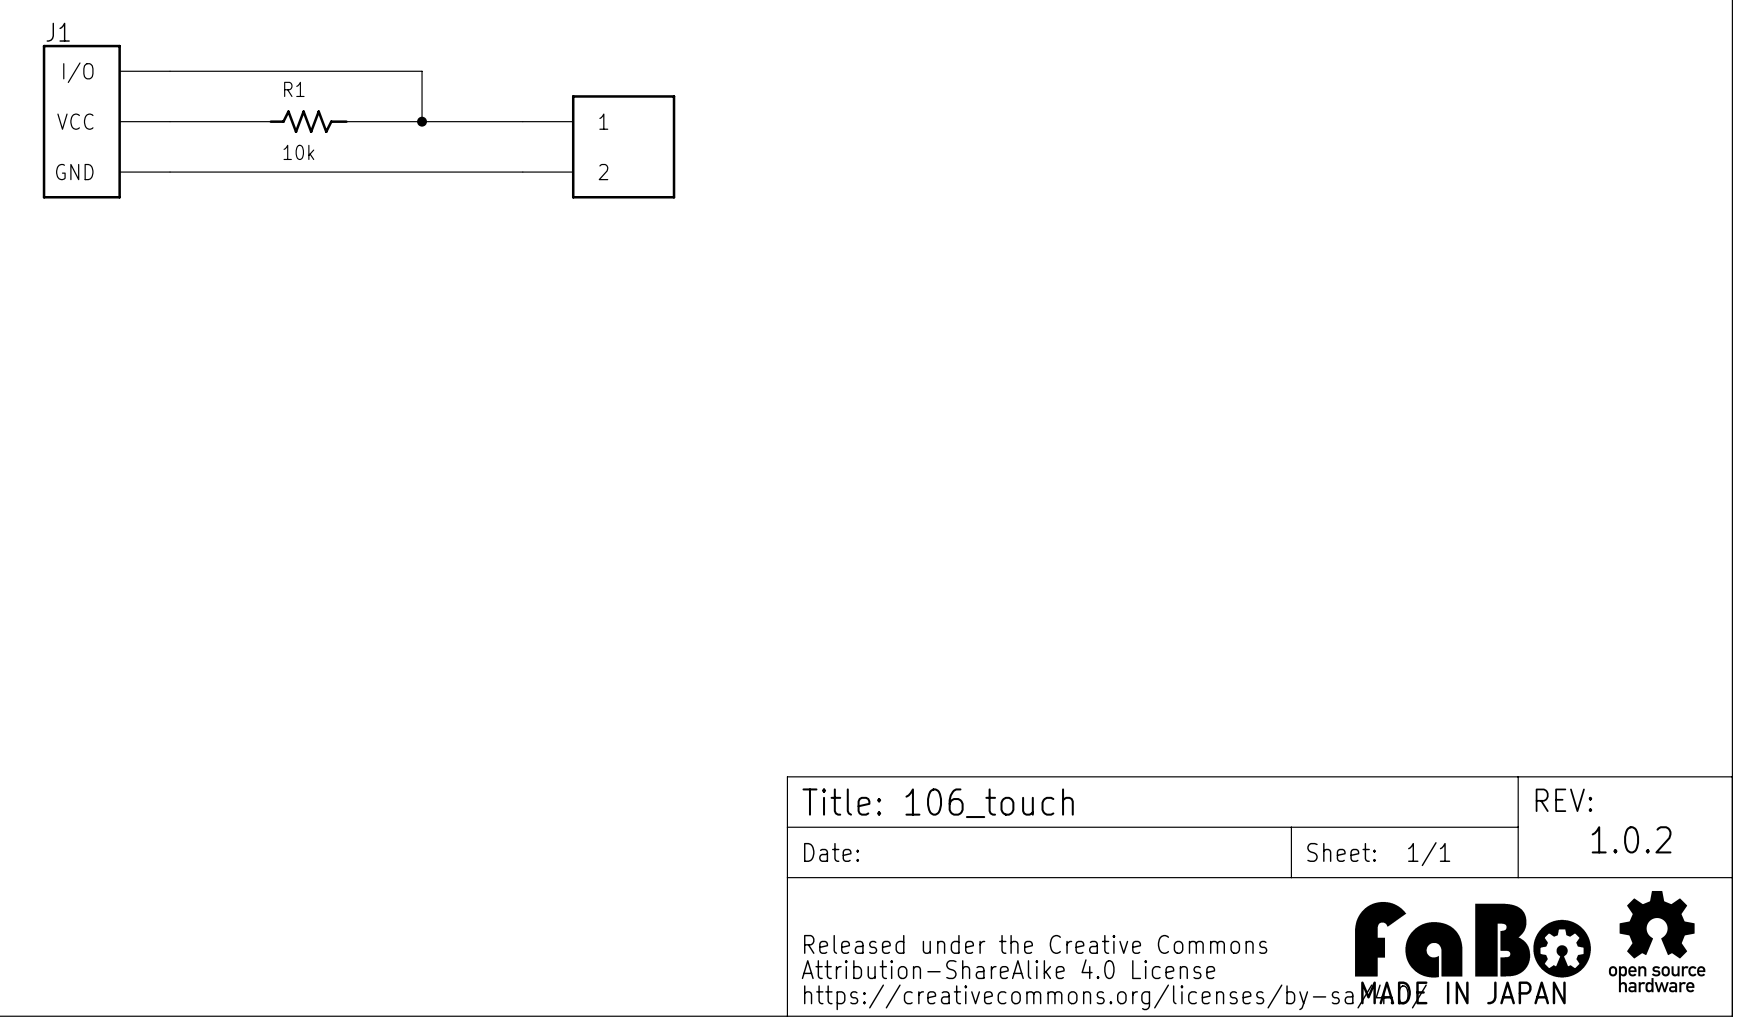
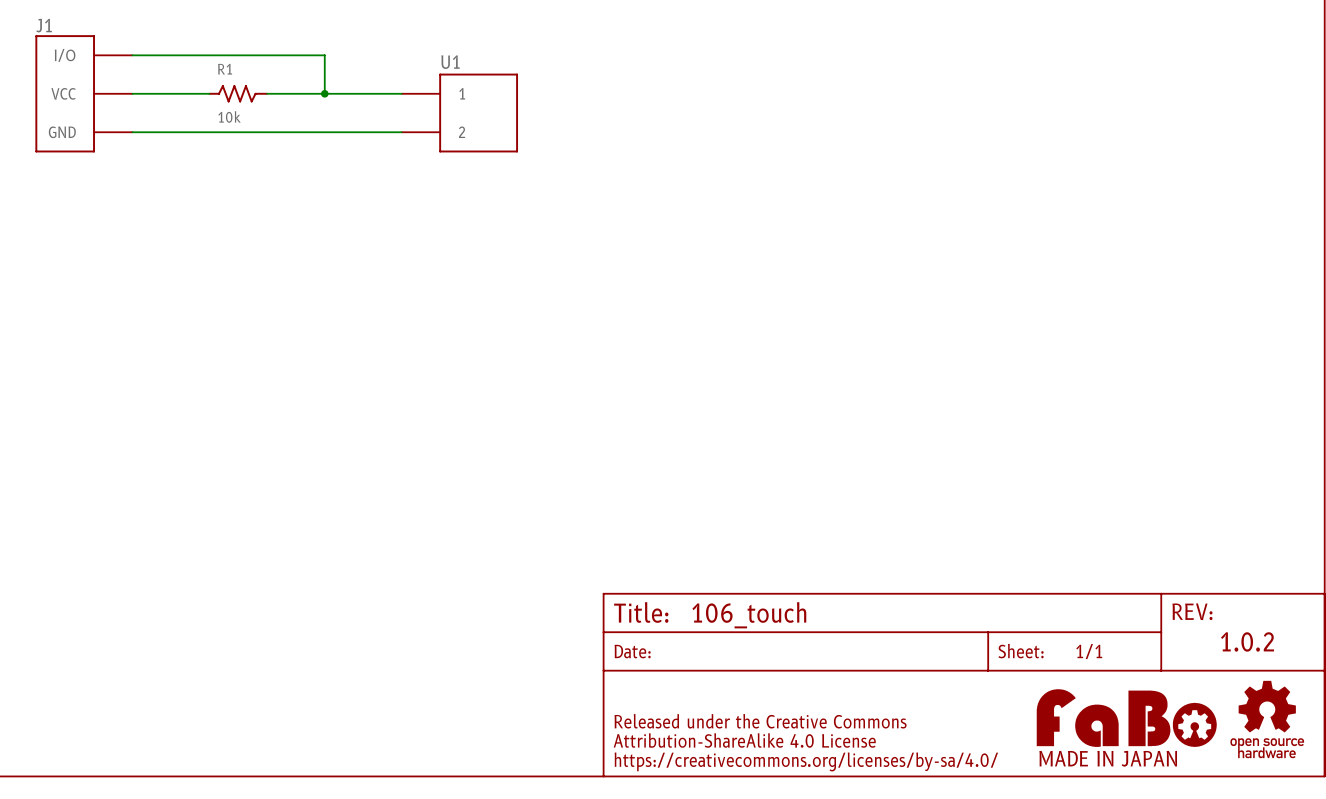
U1 name: none -> U1 (450, 62)

